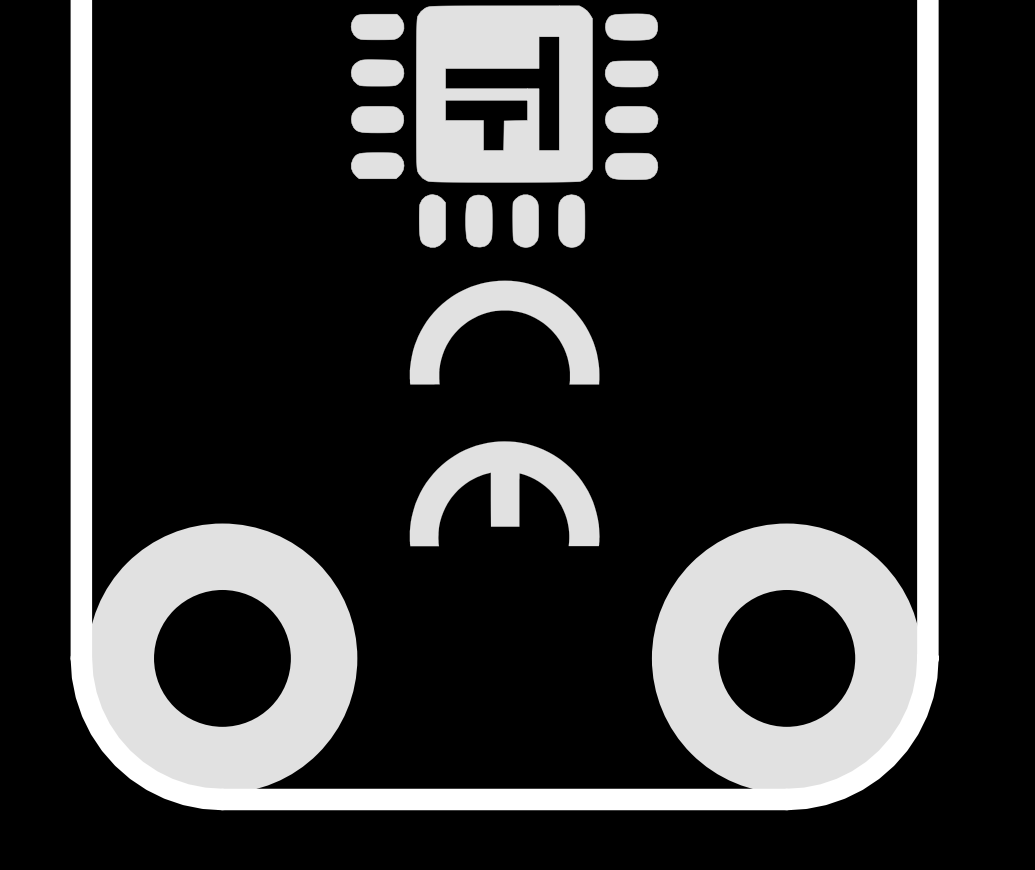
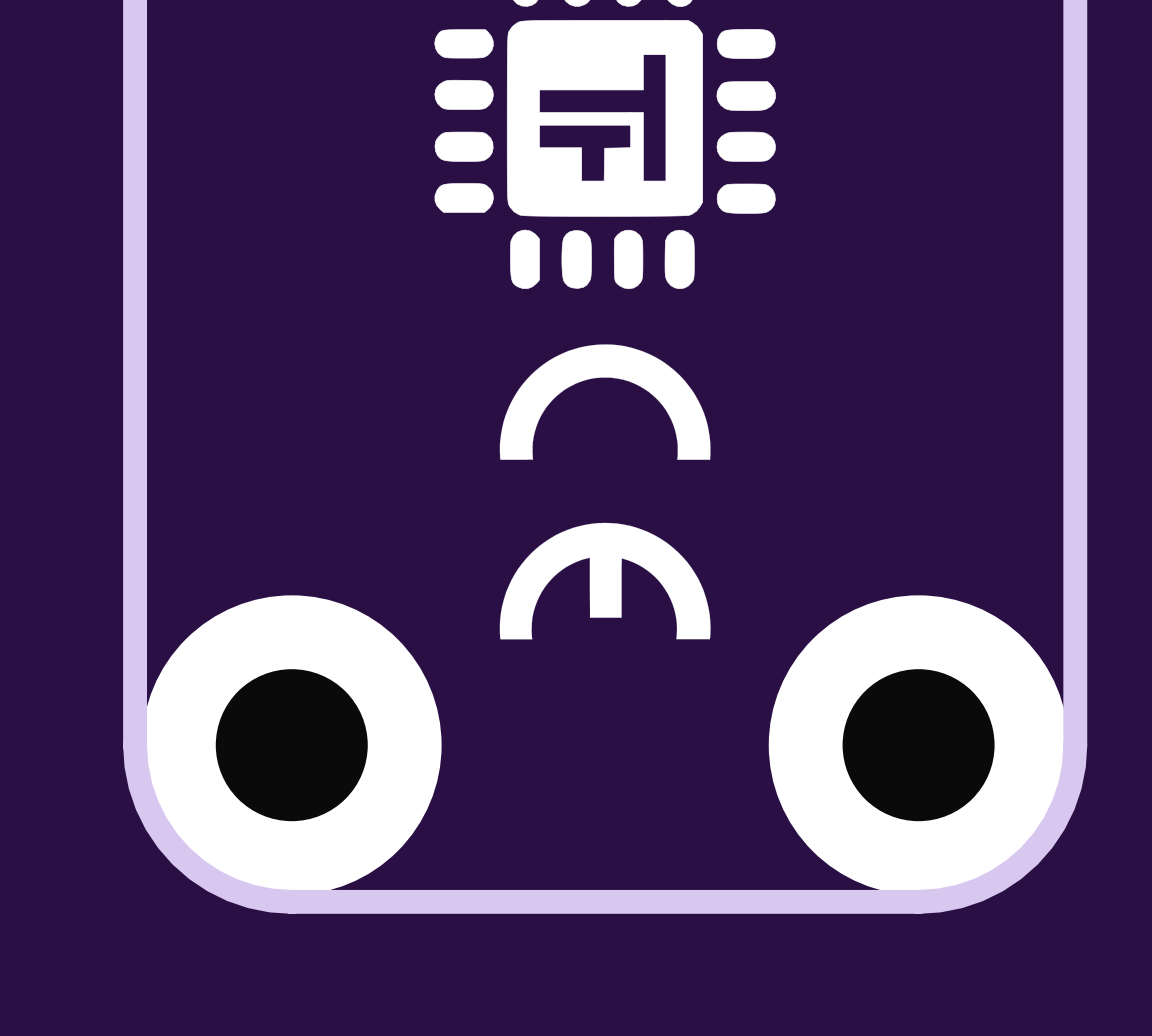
drawing position: (504, 413) -> (605, 491)

